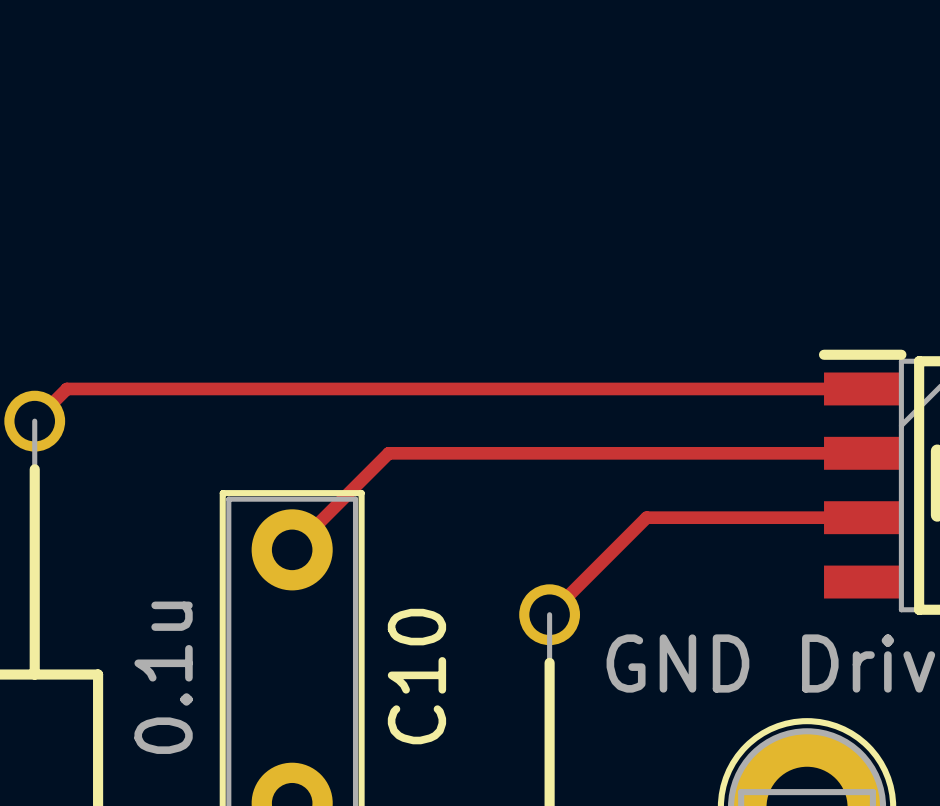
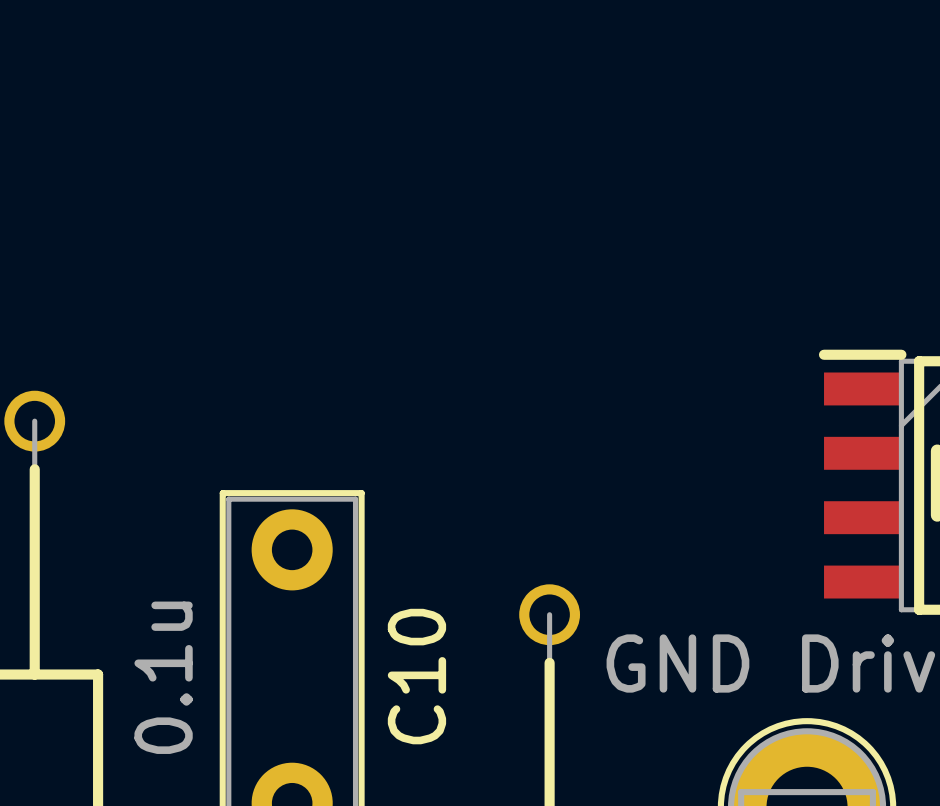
track: (862, 388) (66, 388) (34, 421) -> none
track: (862, 453) (388, 453) (292, 549) -> none
track: (862, 517) (646, 517) (549, 614) -> none

